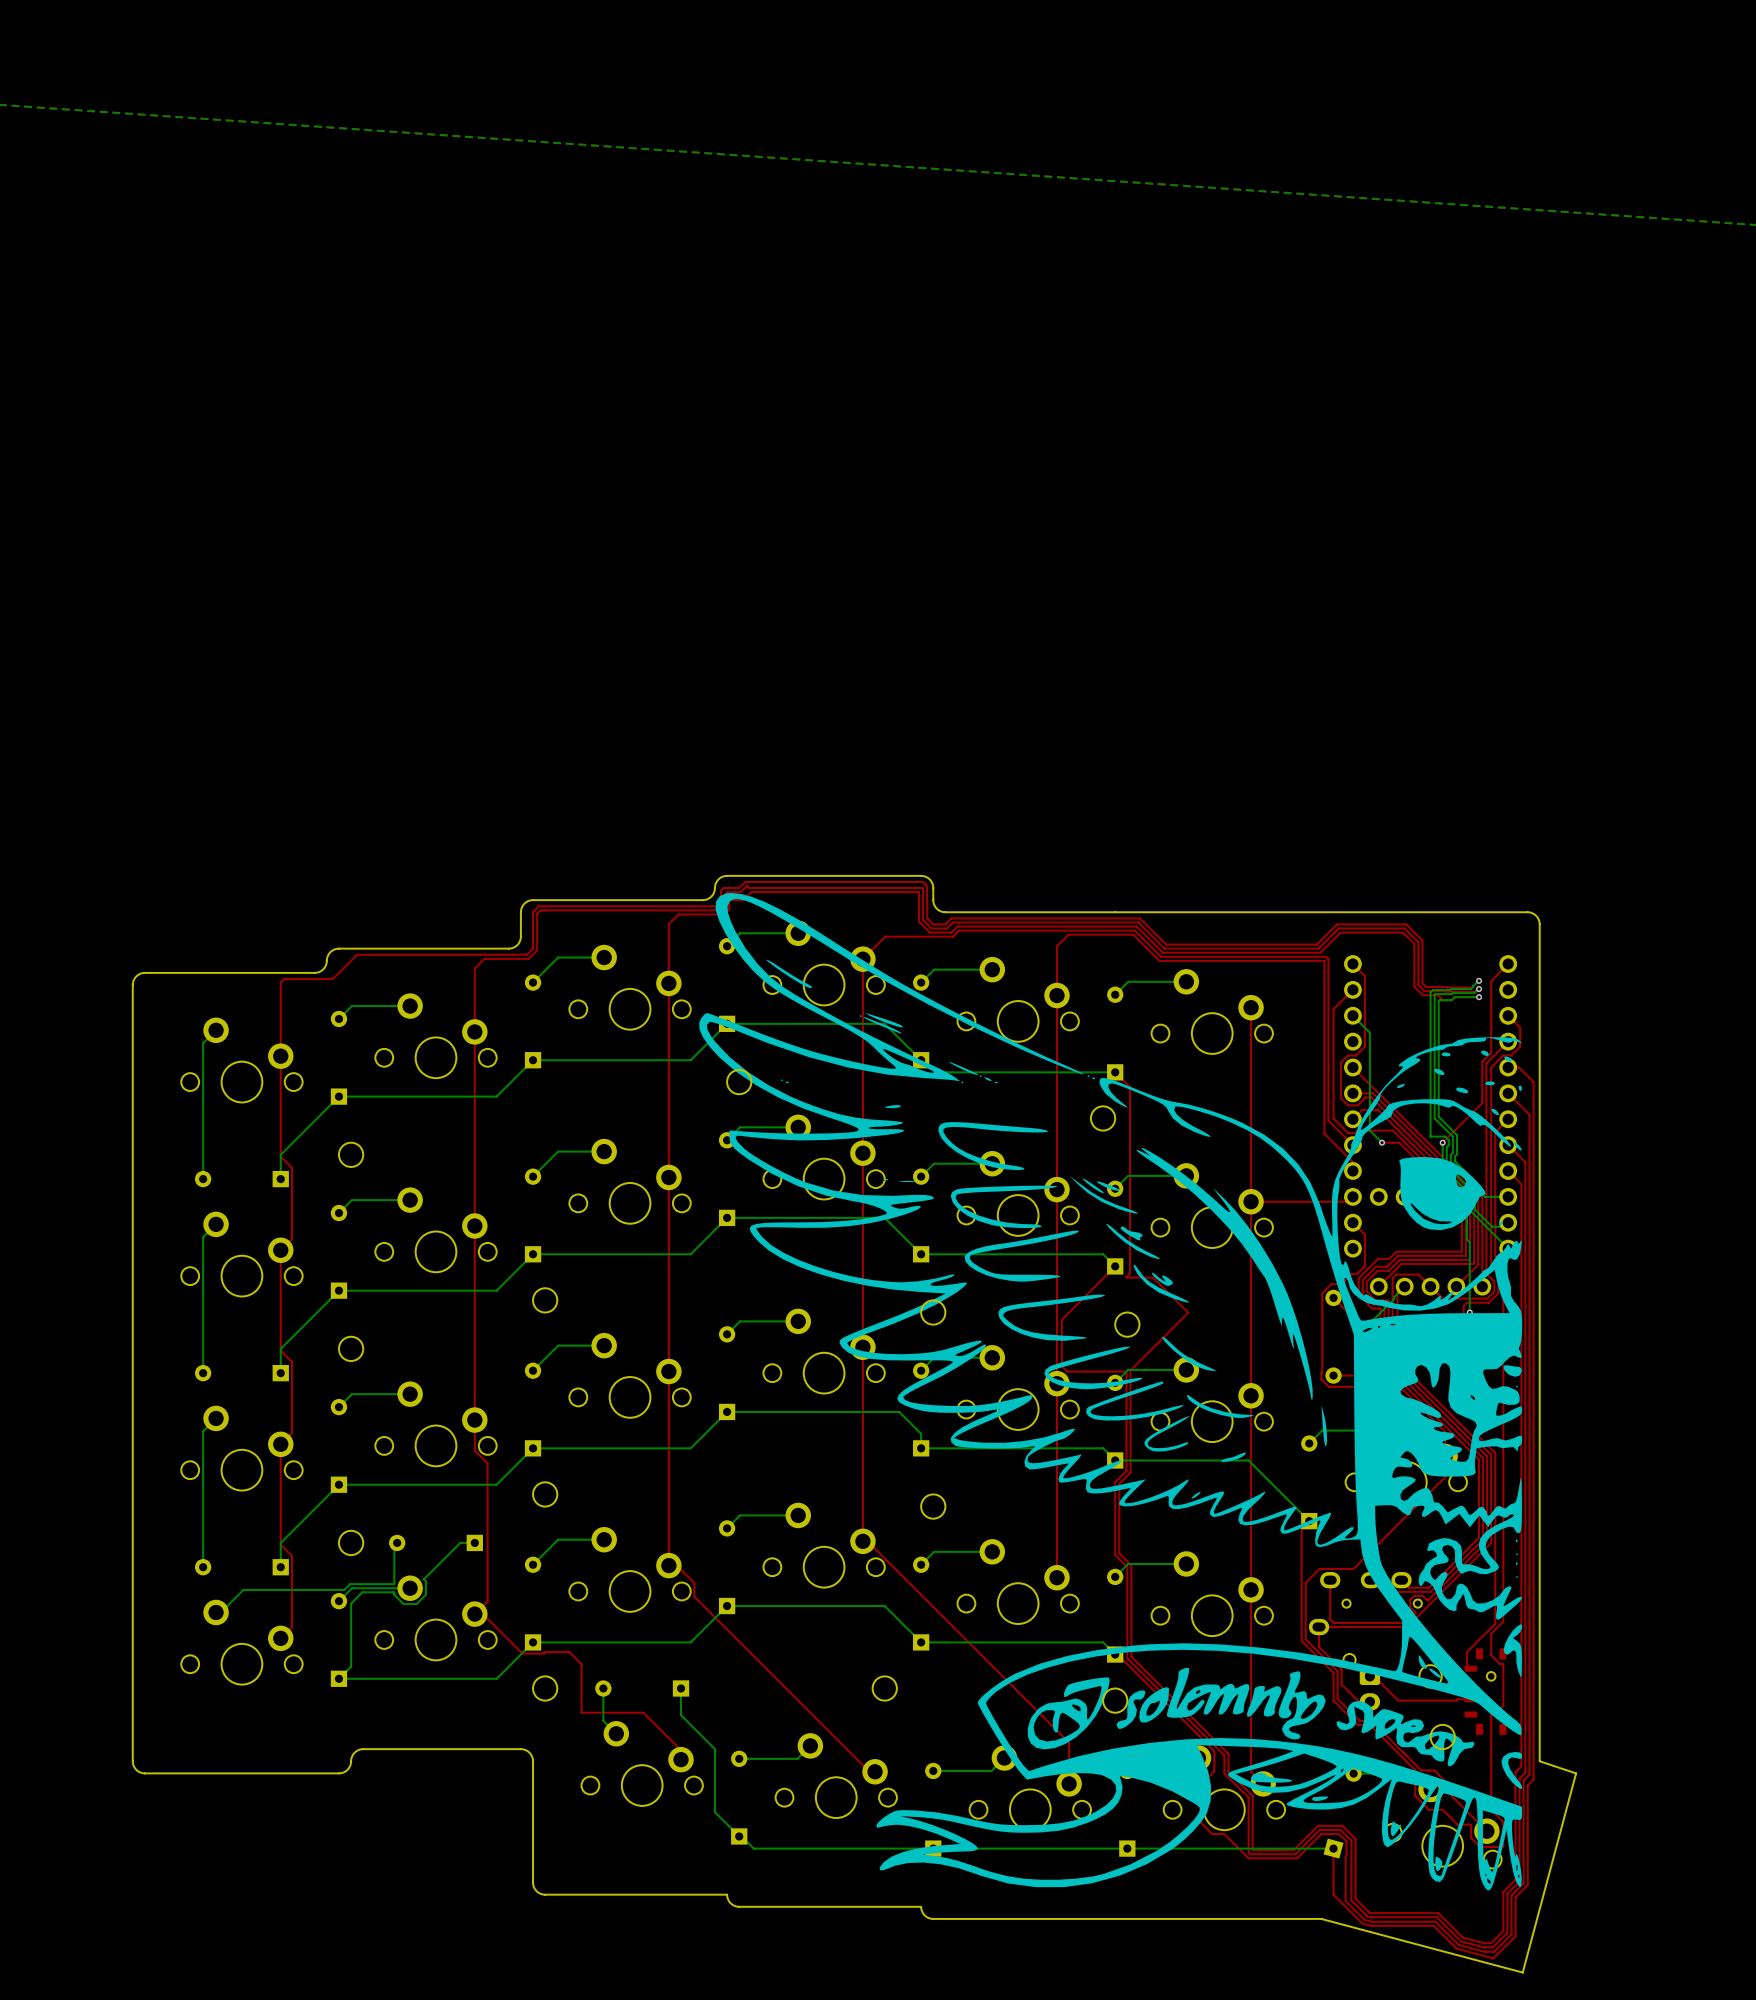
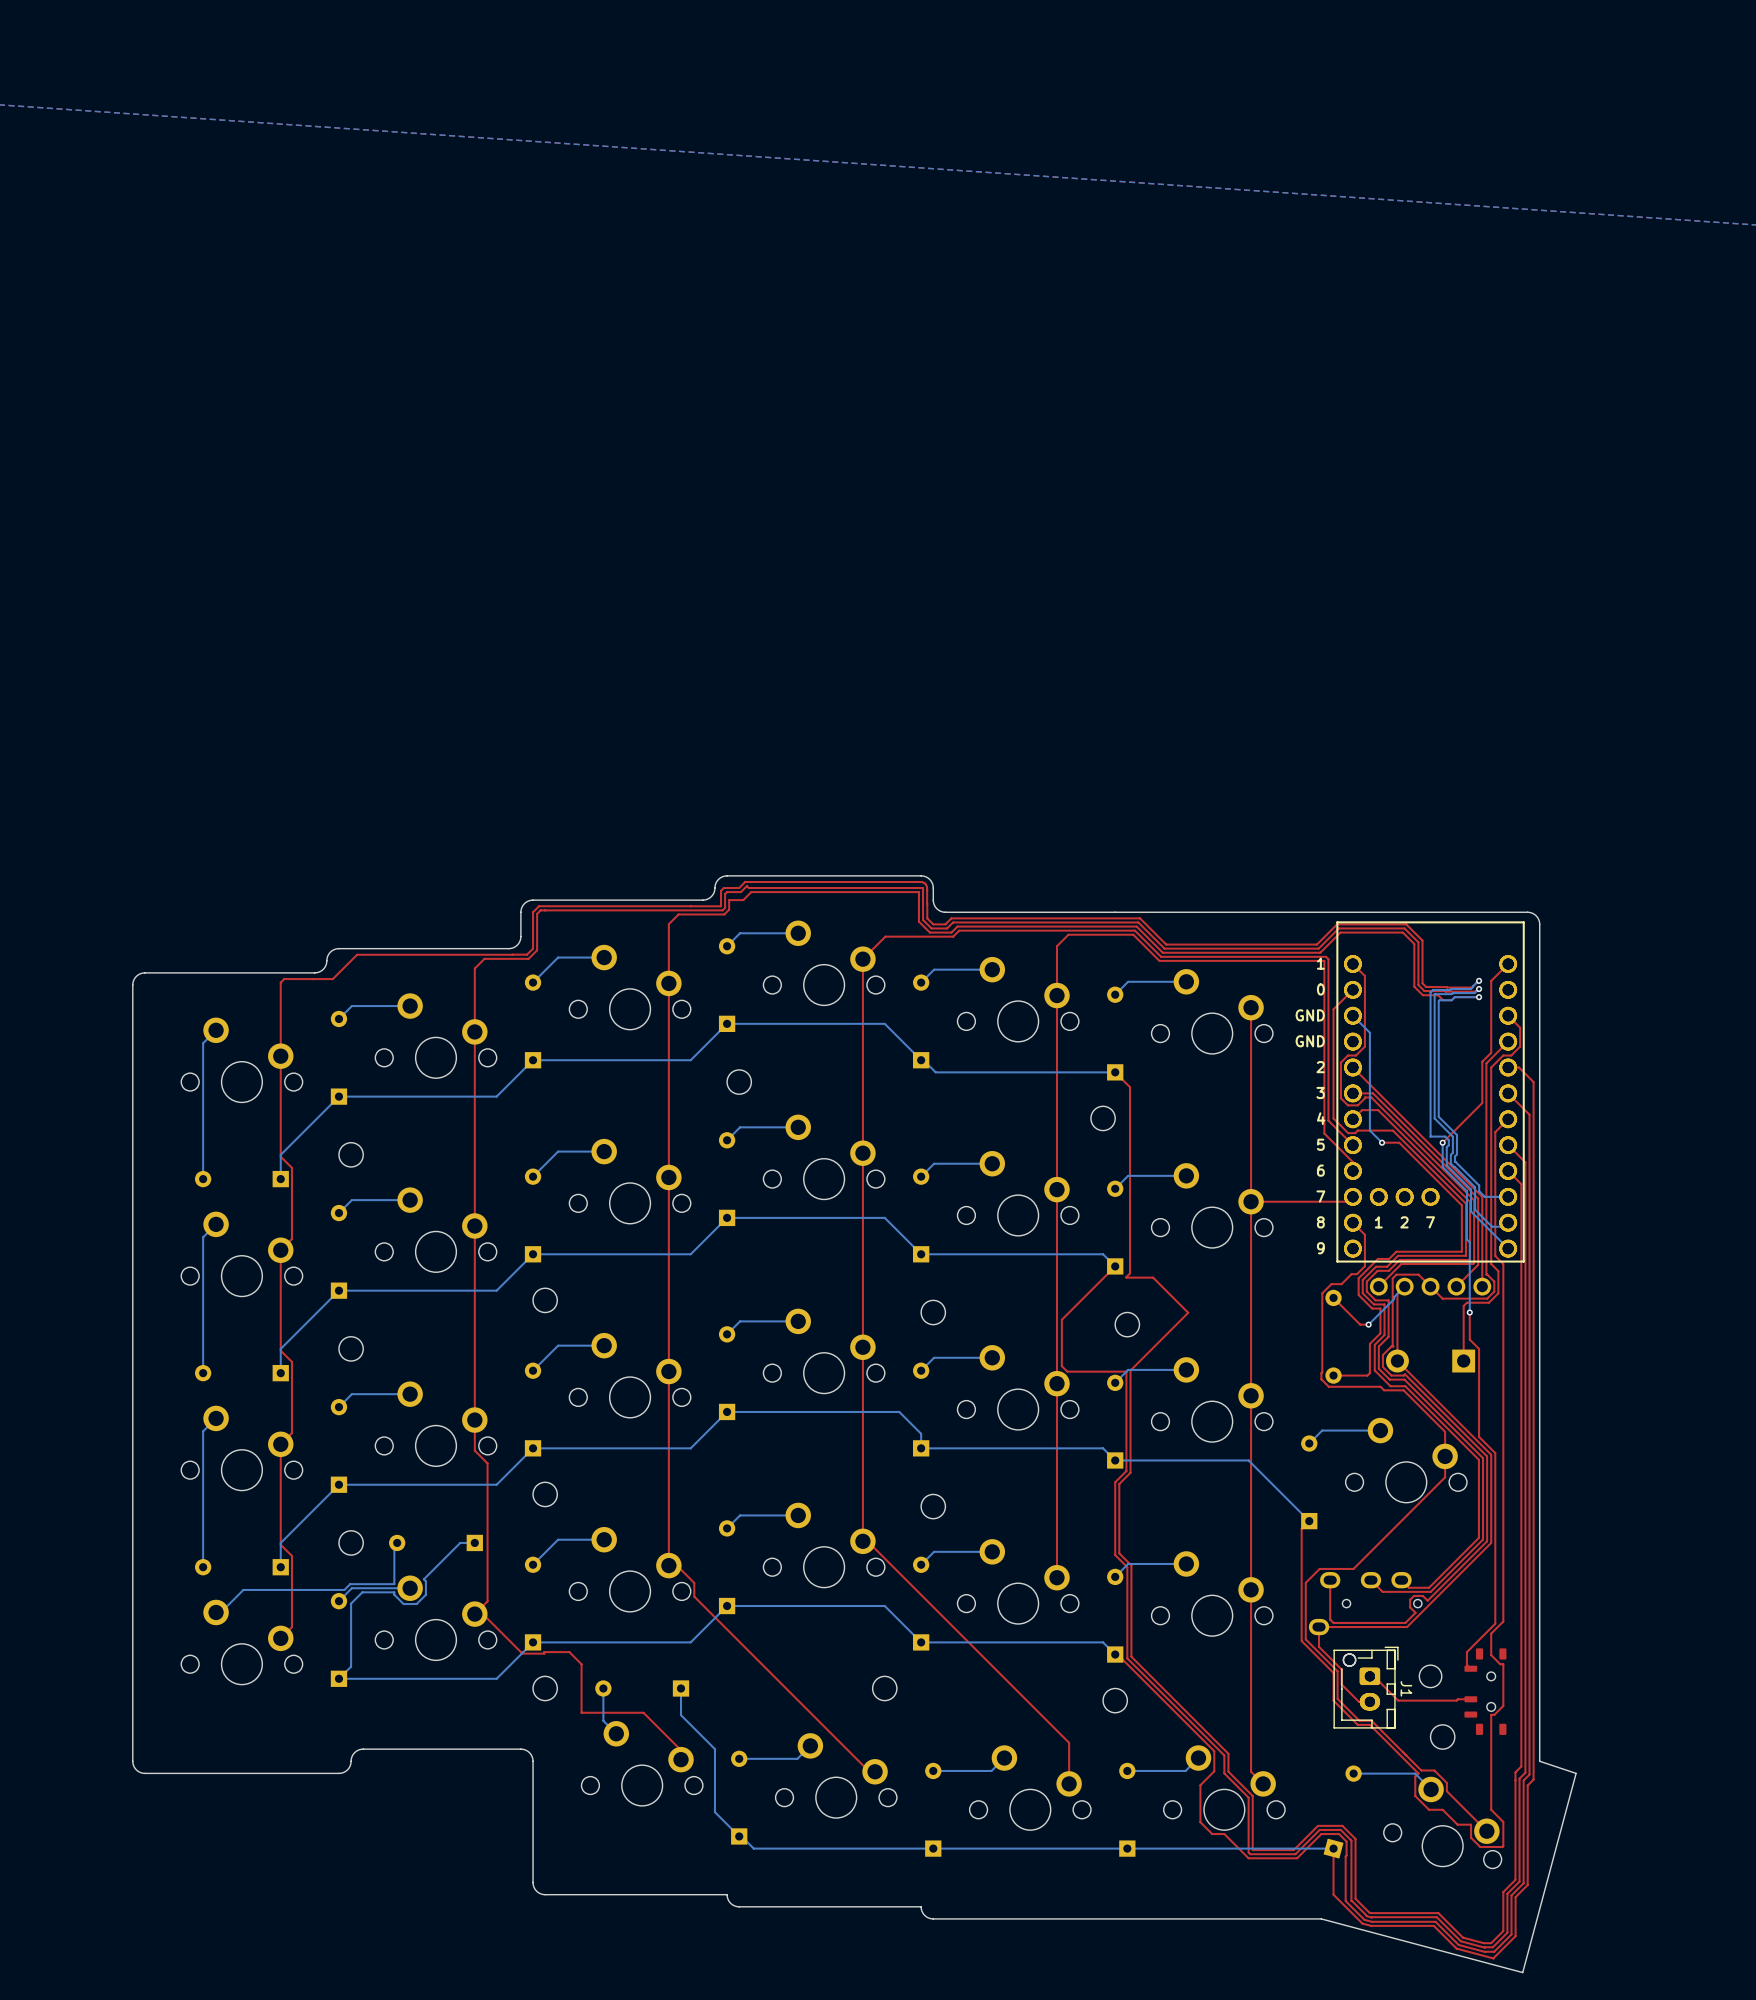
drawing: [699, 892, 1523, 1891] -> none
part: none -> (1430, 1091)
J1: none -> (1366, 1687)

